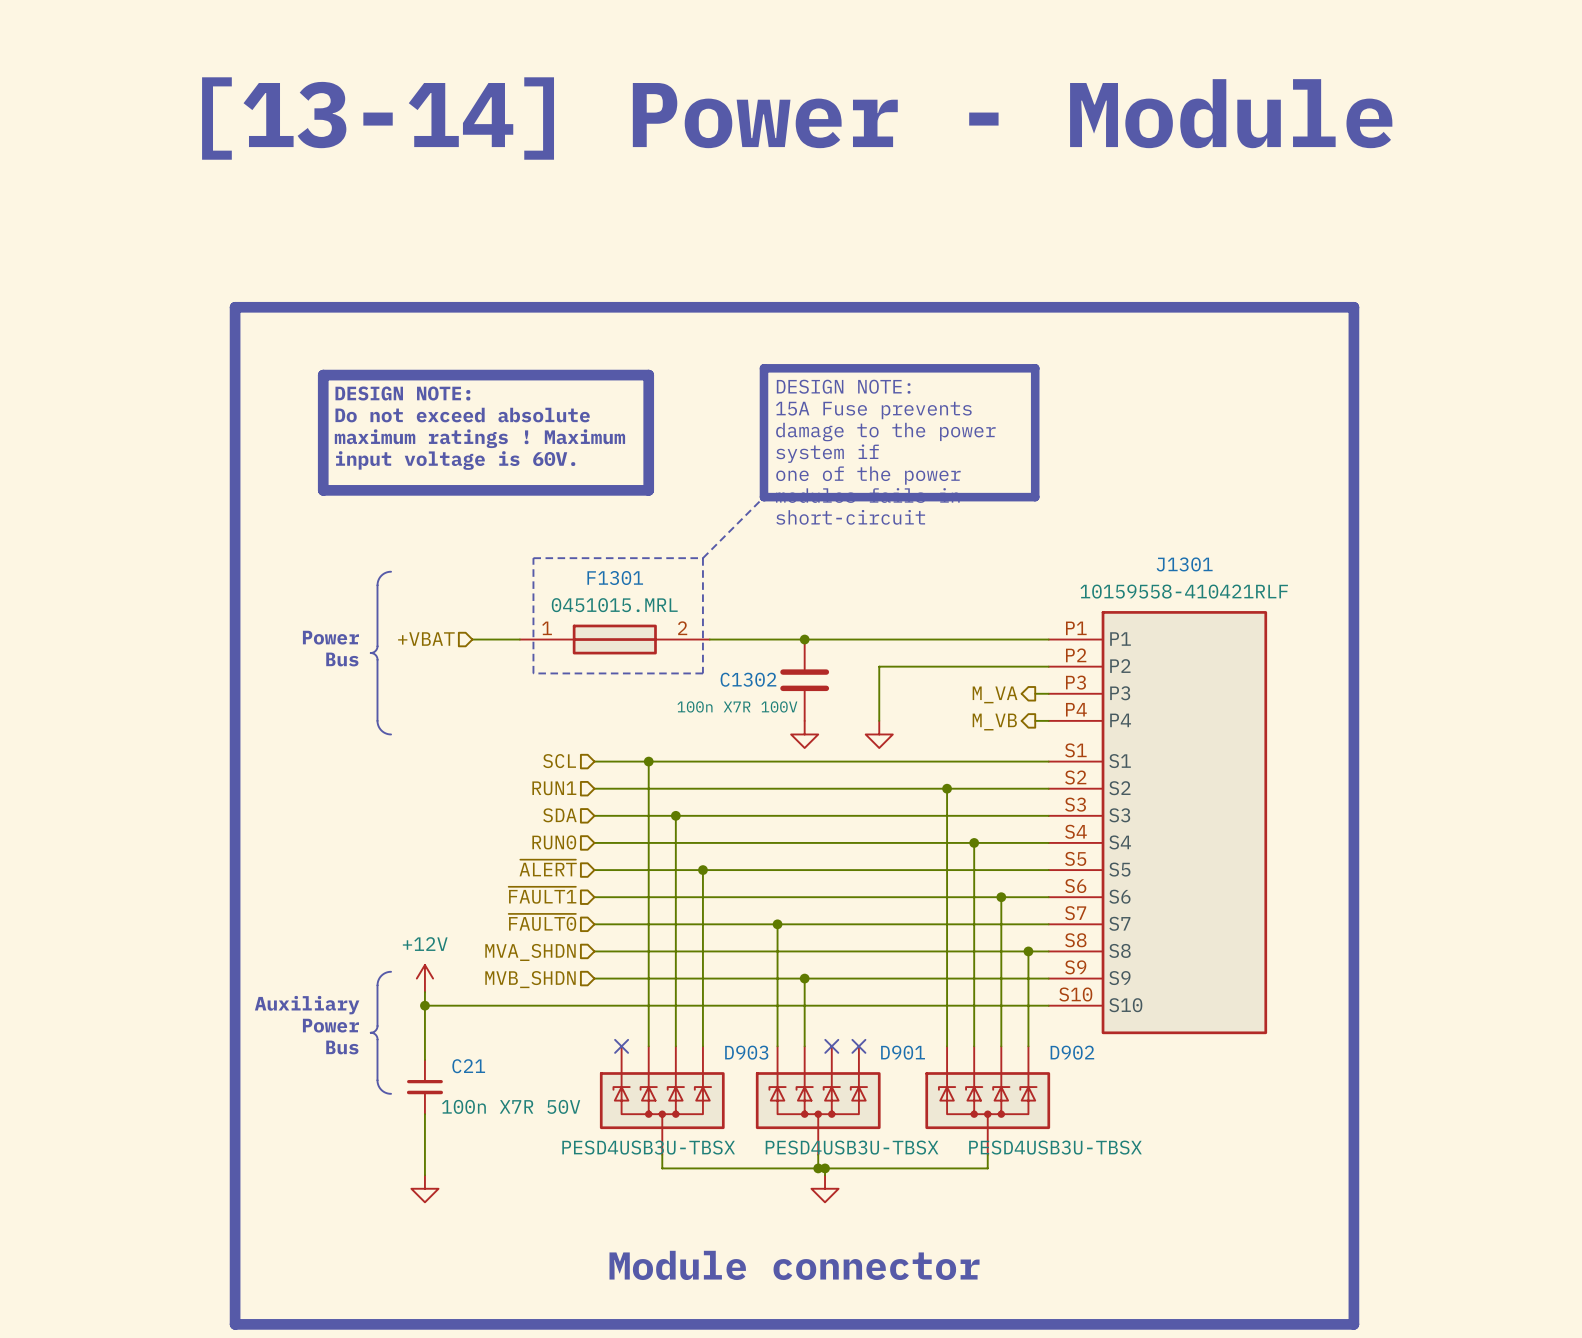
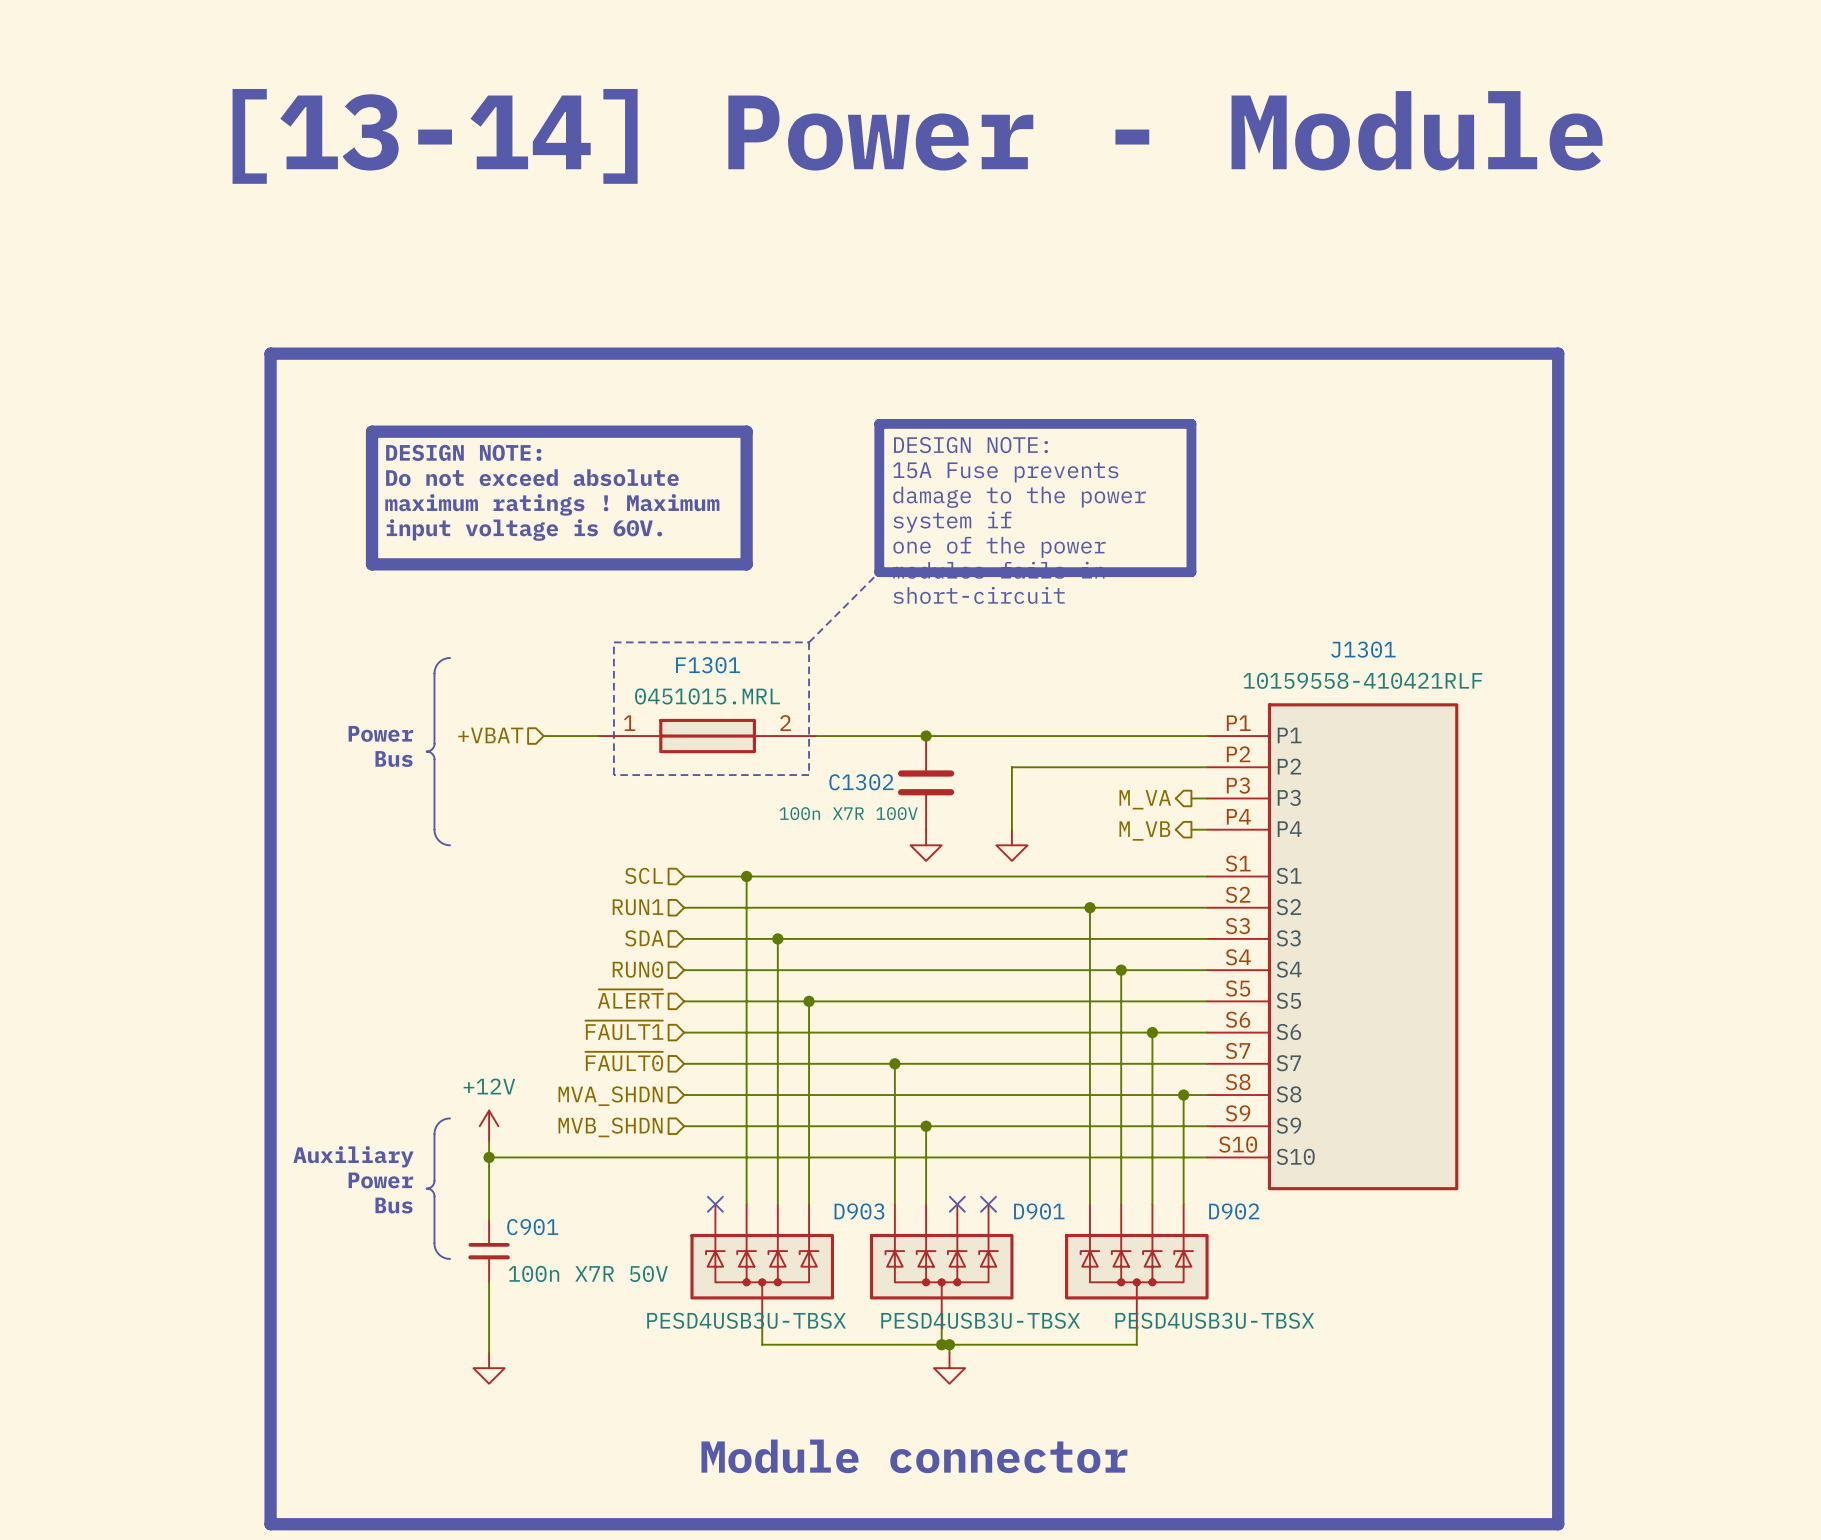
C21 name: C21 (468, 1066) -> C901 (532, 1227)

